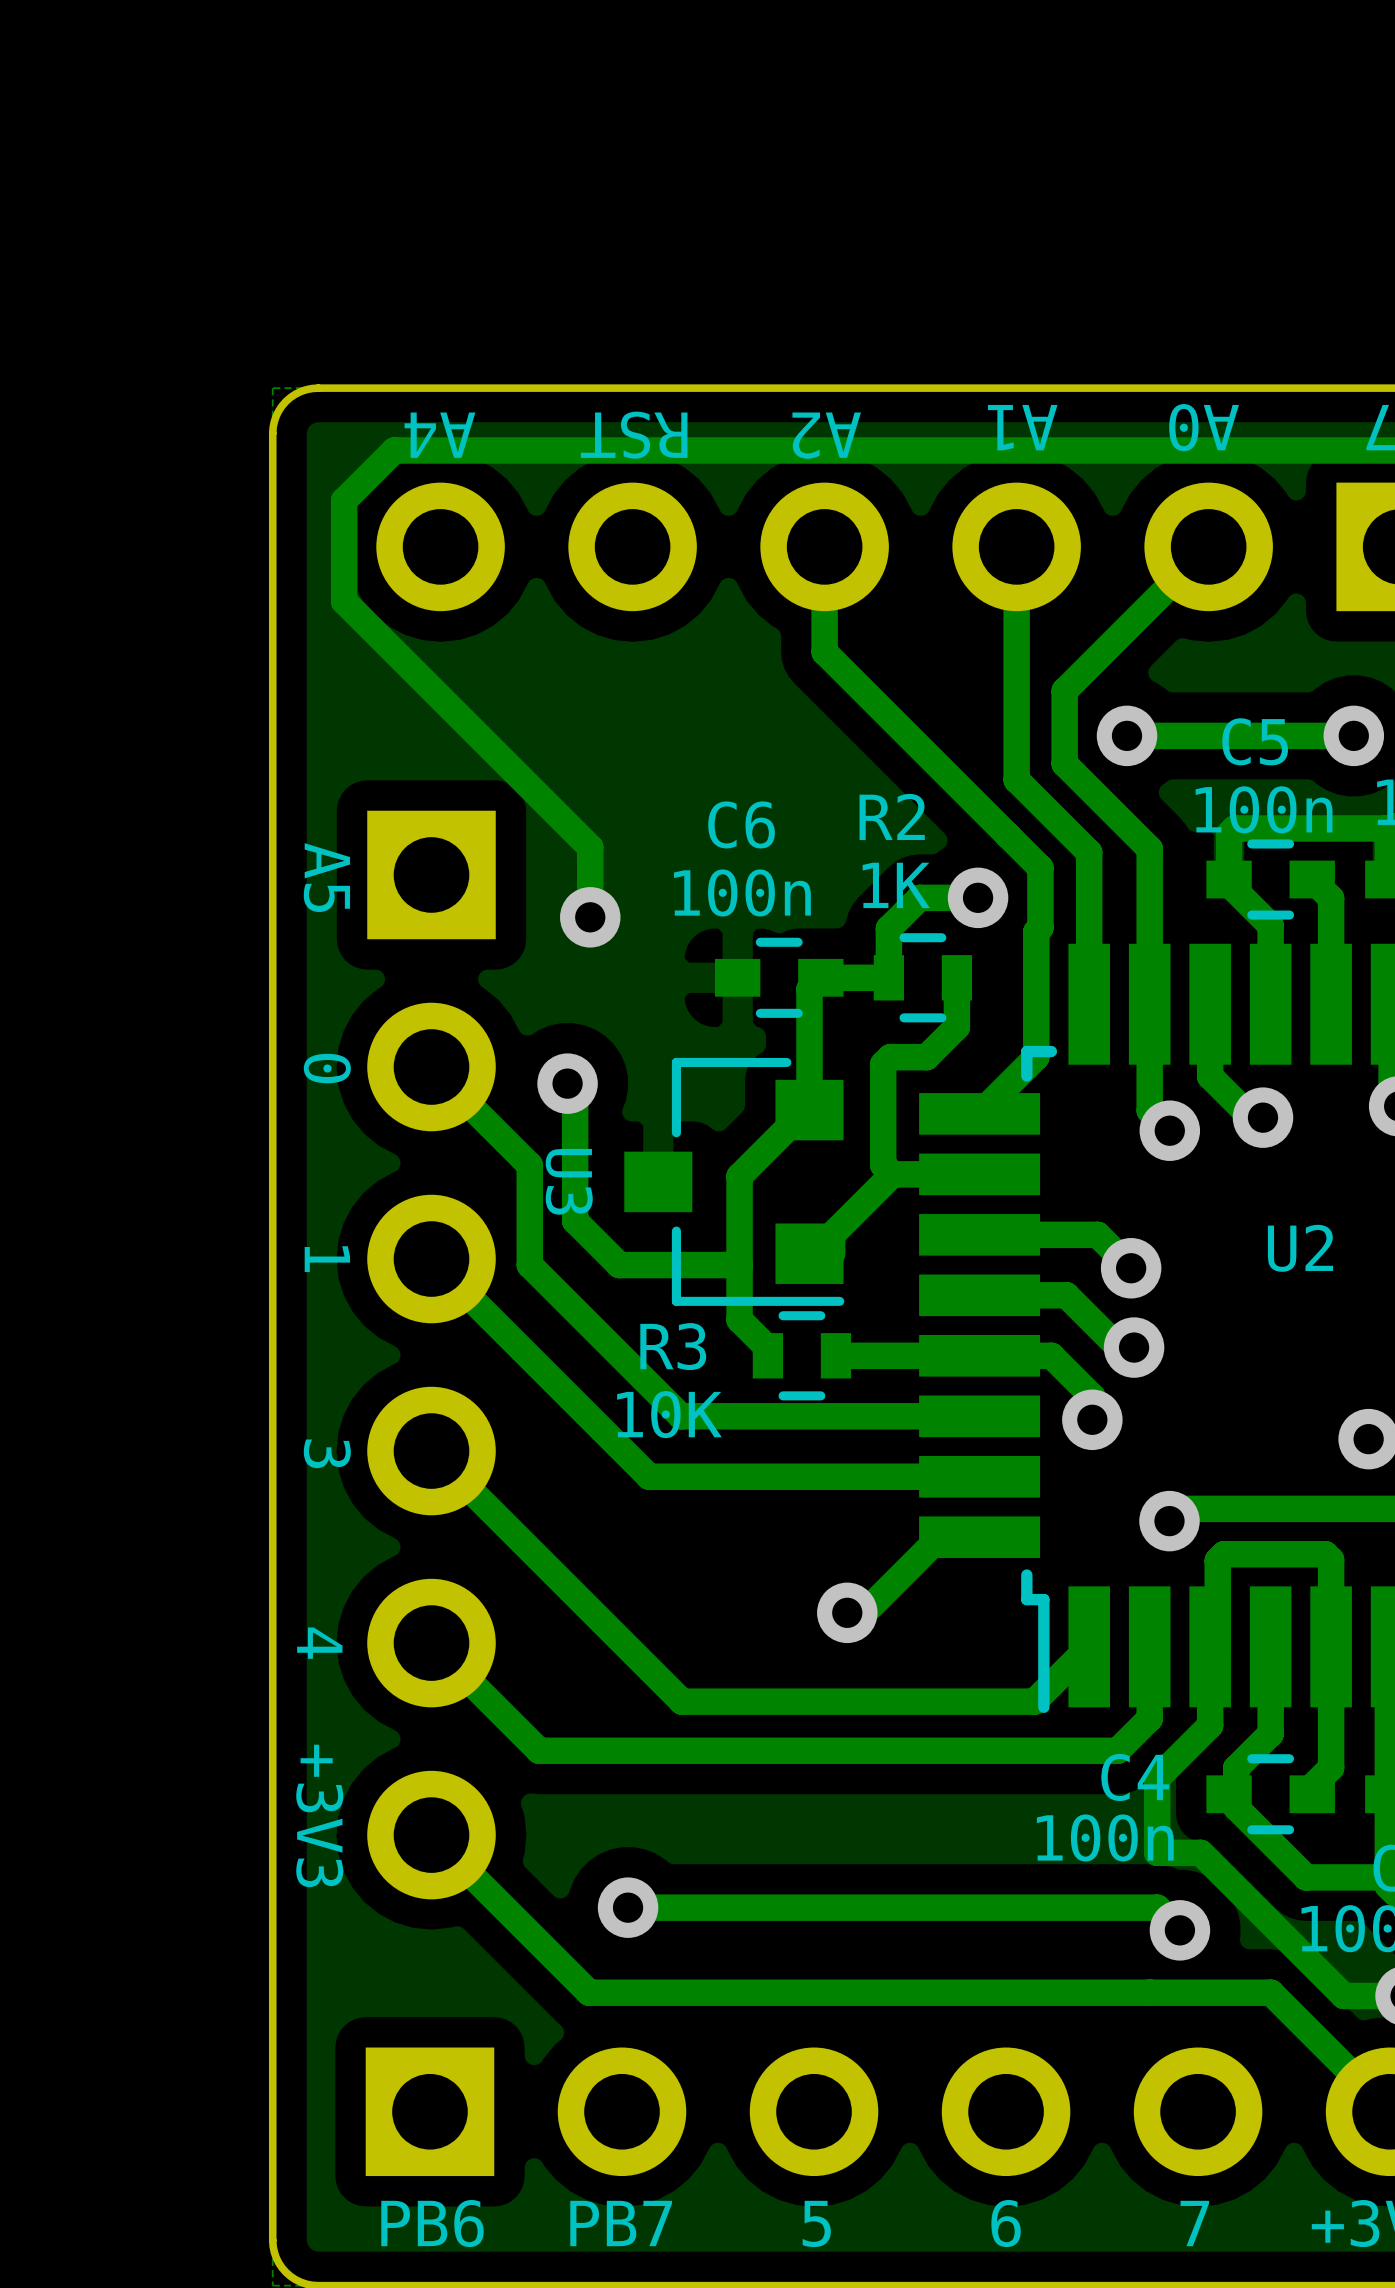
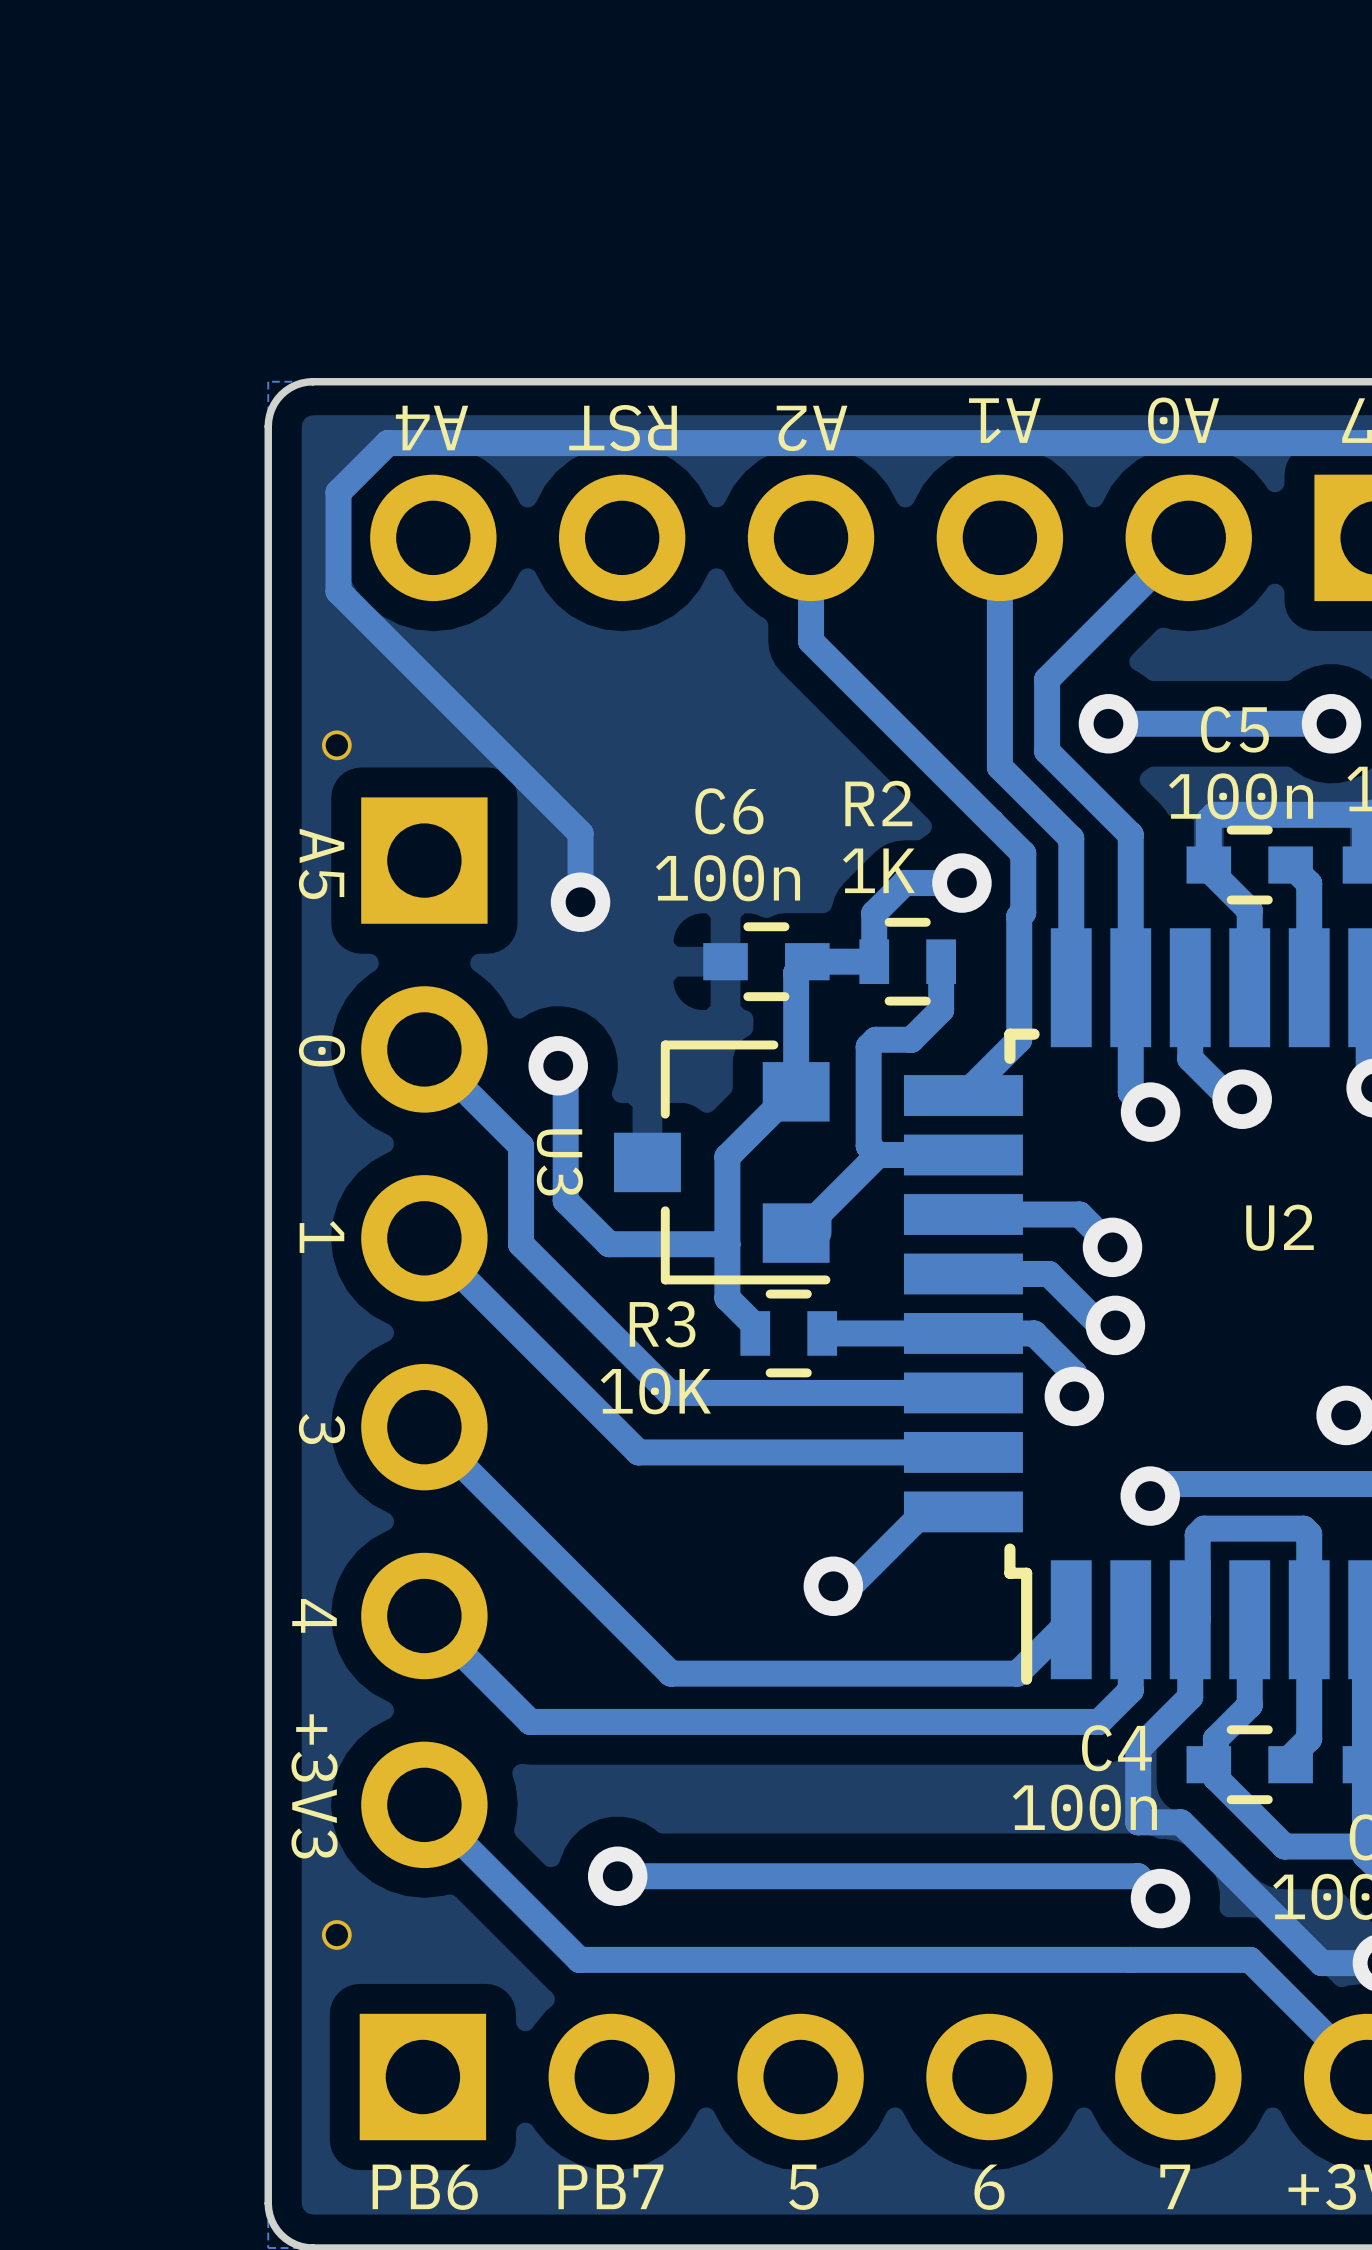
part: none -> (336, 745)
part: none -> (336, 1934)

